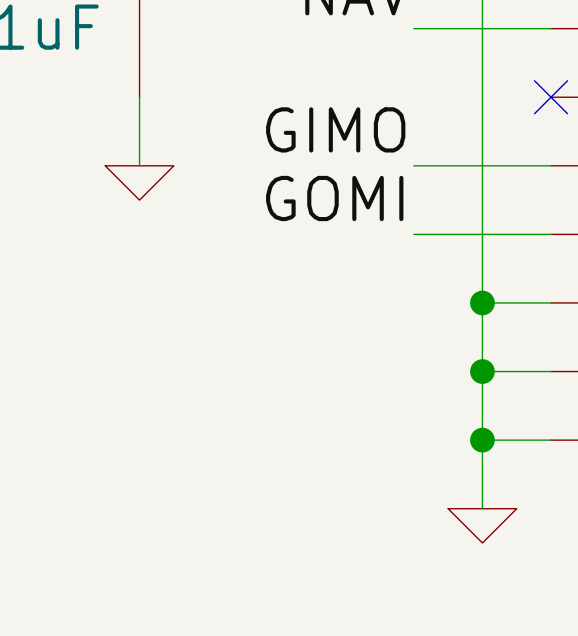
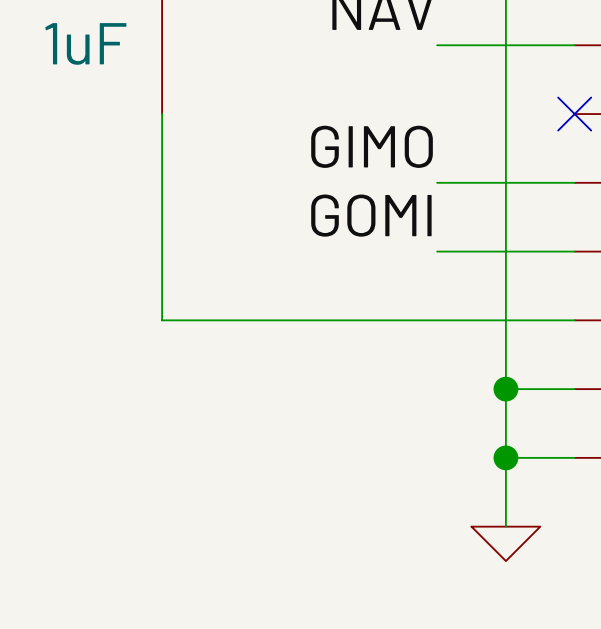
wire: none -> (162, 182) (162, 320) (505, 320)
power symbol: (139, 182) -> none
junction: (482, 302) -> none

